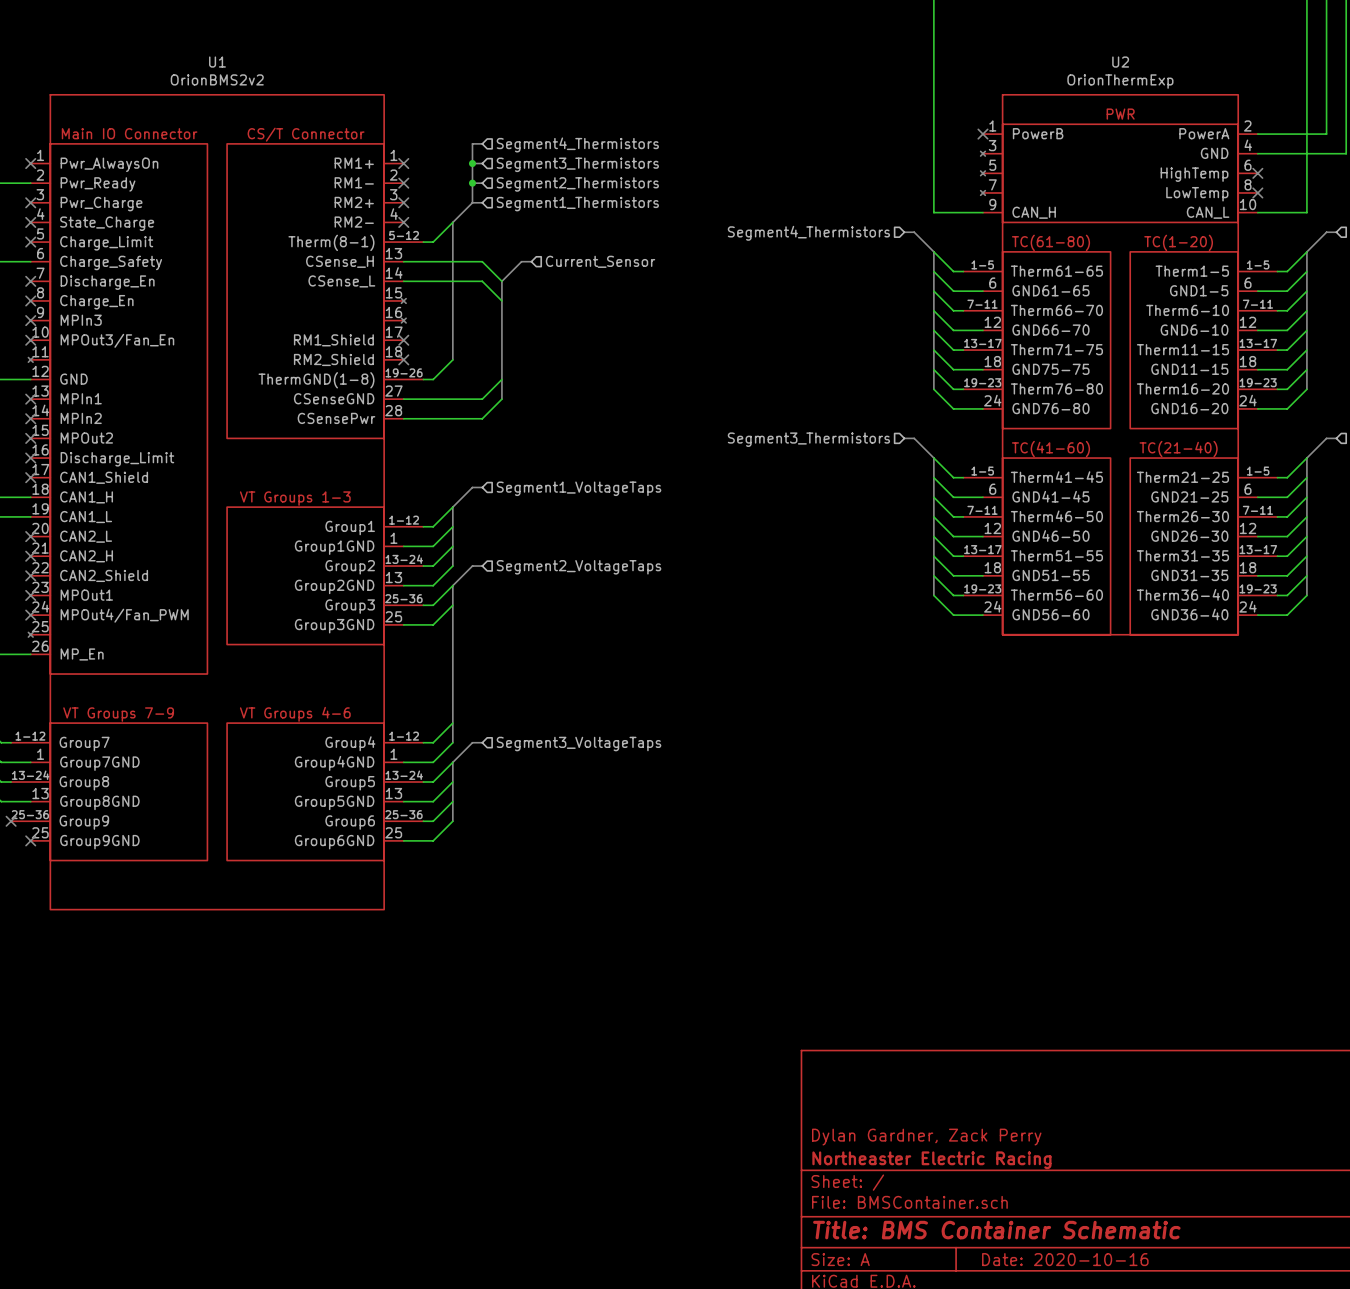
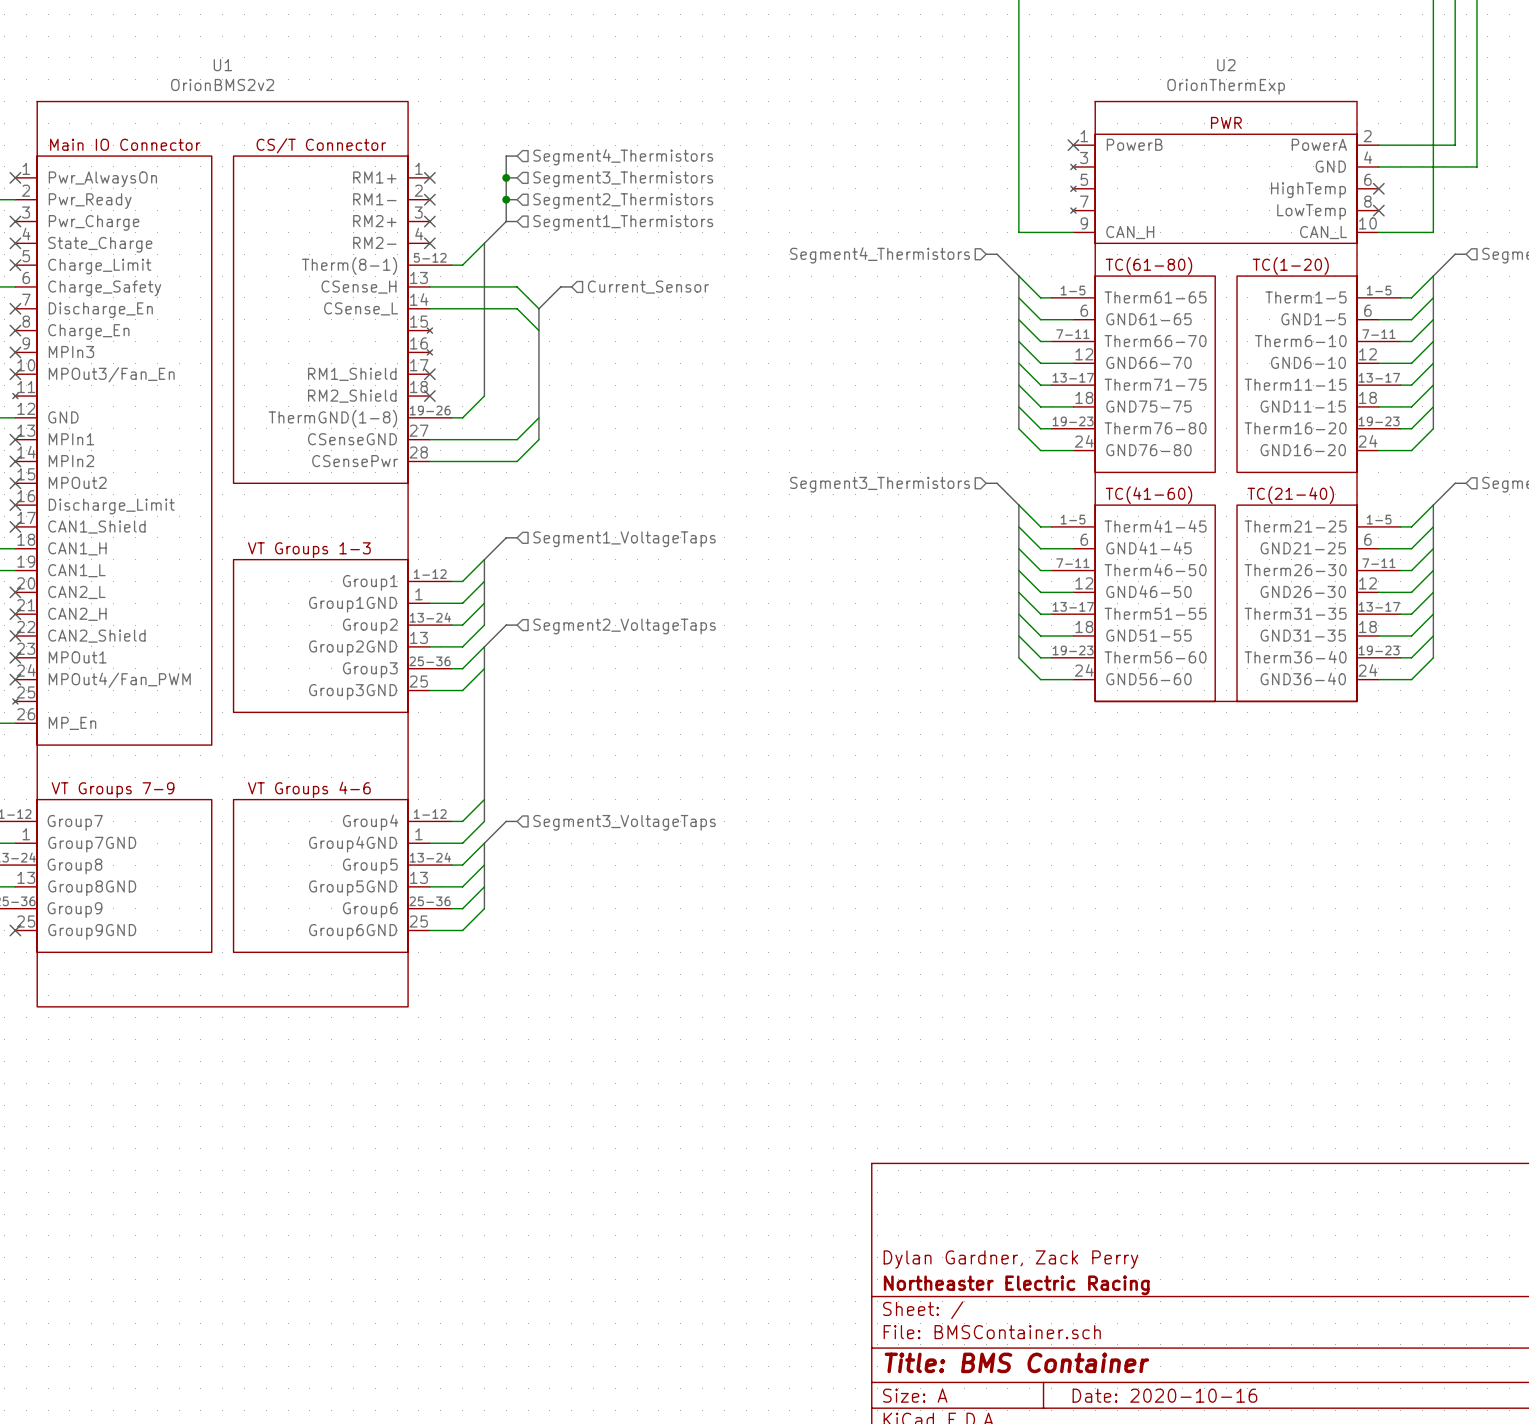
title block: Title: BMS Container Schematic (996, 1230) -> Title: BMS Container (1016, 1362)

